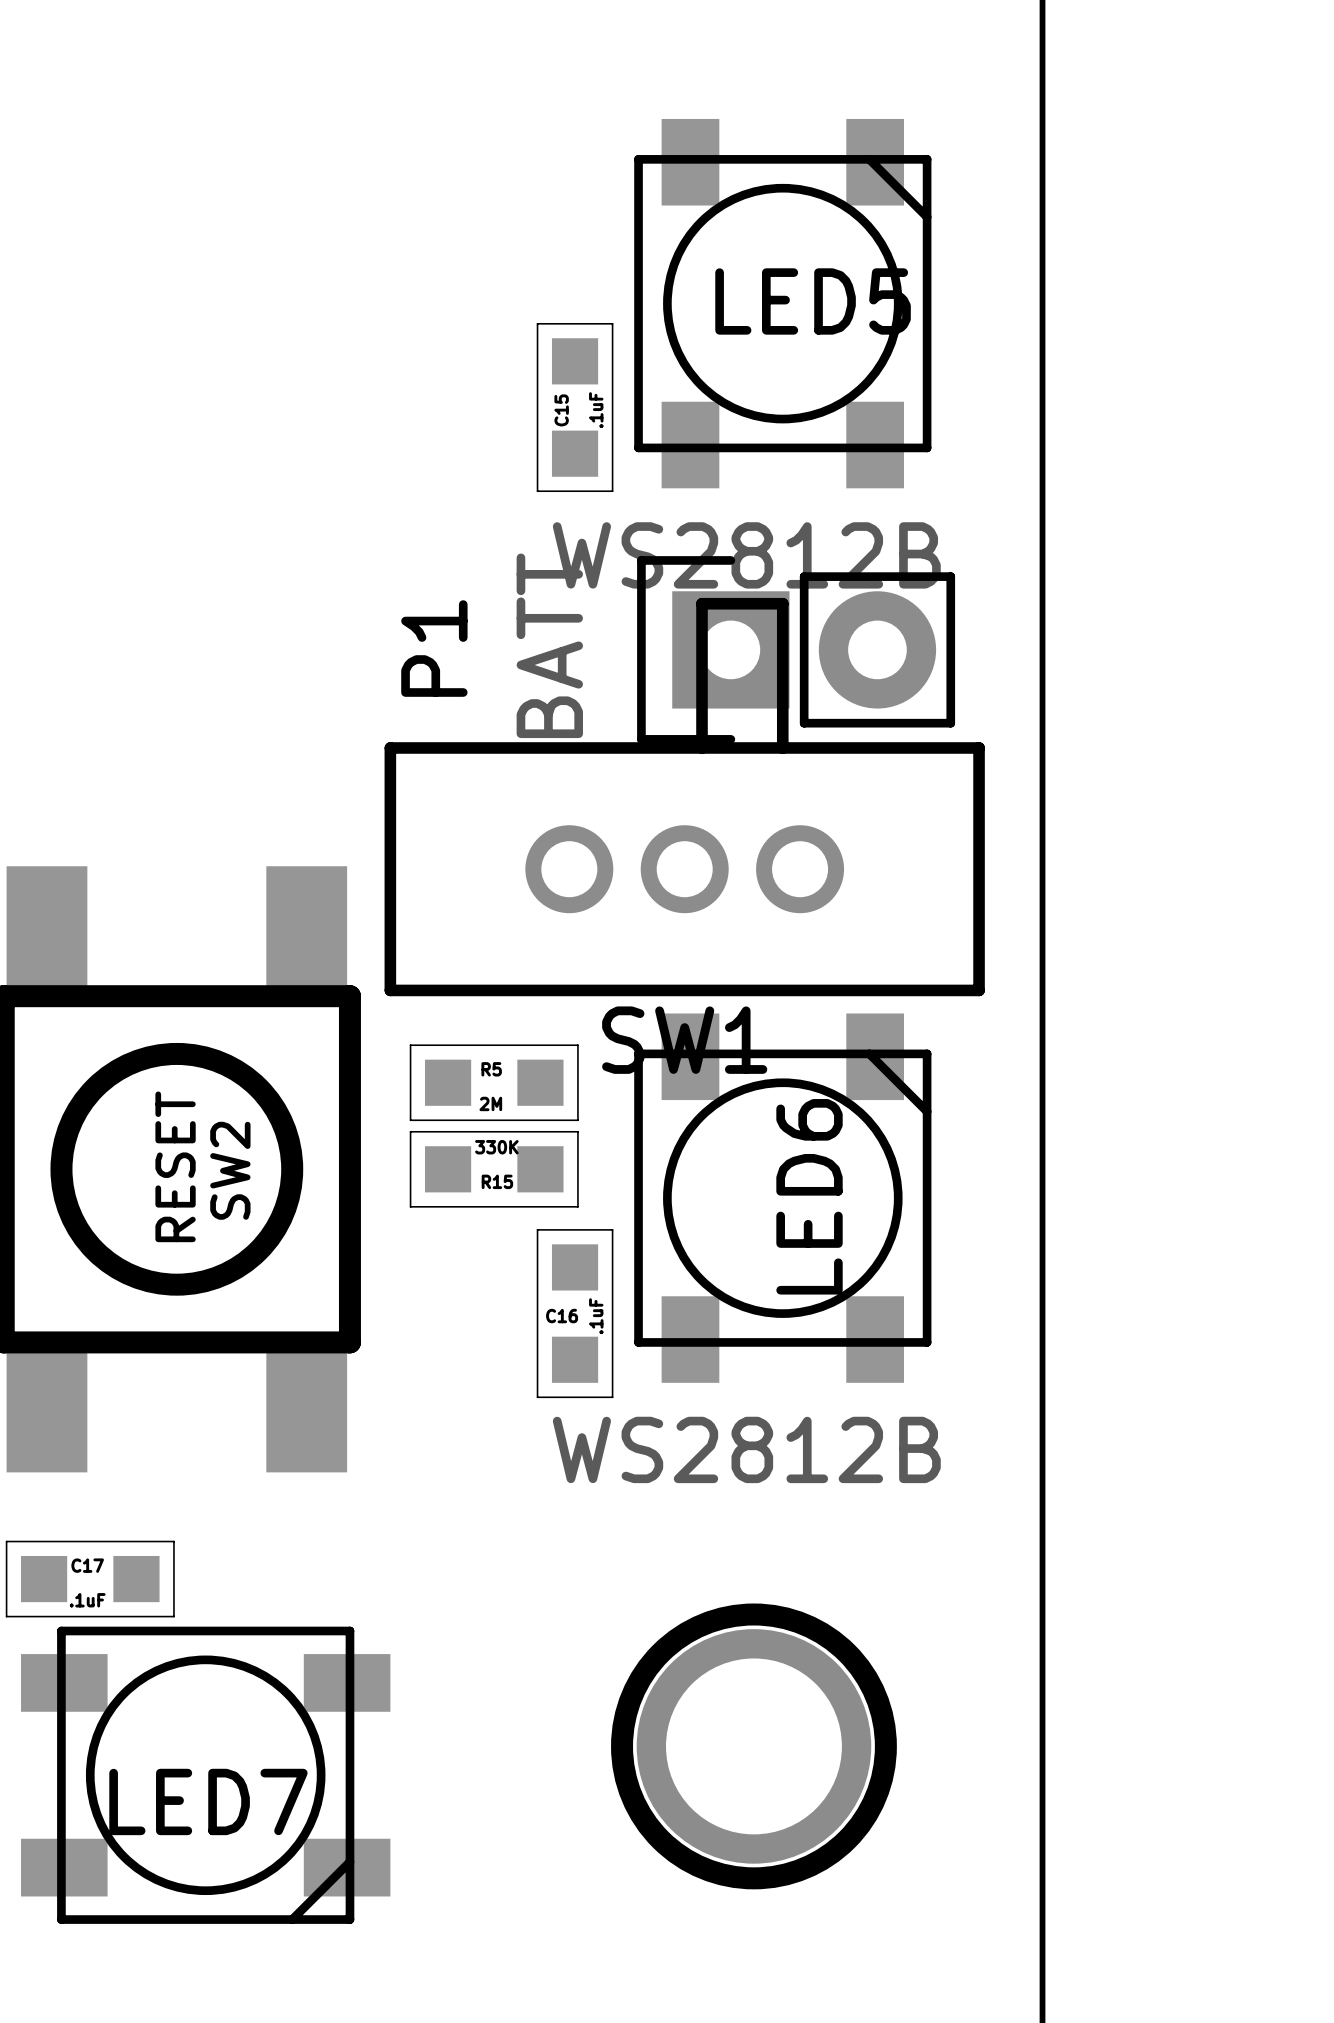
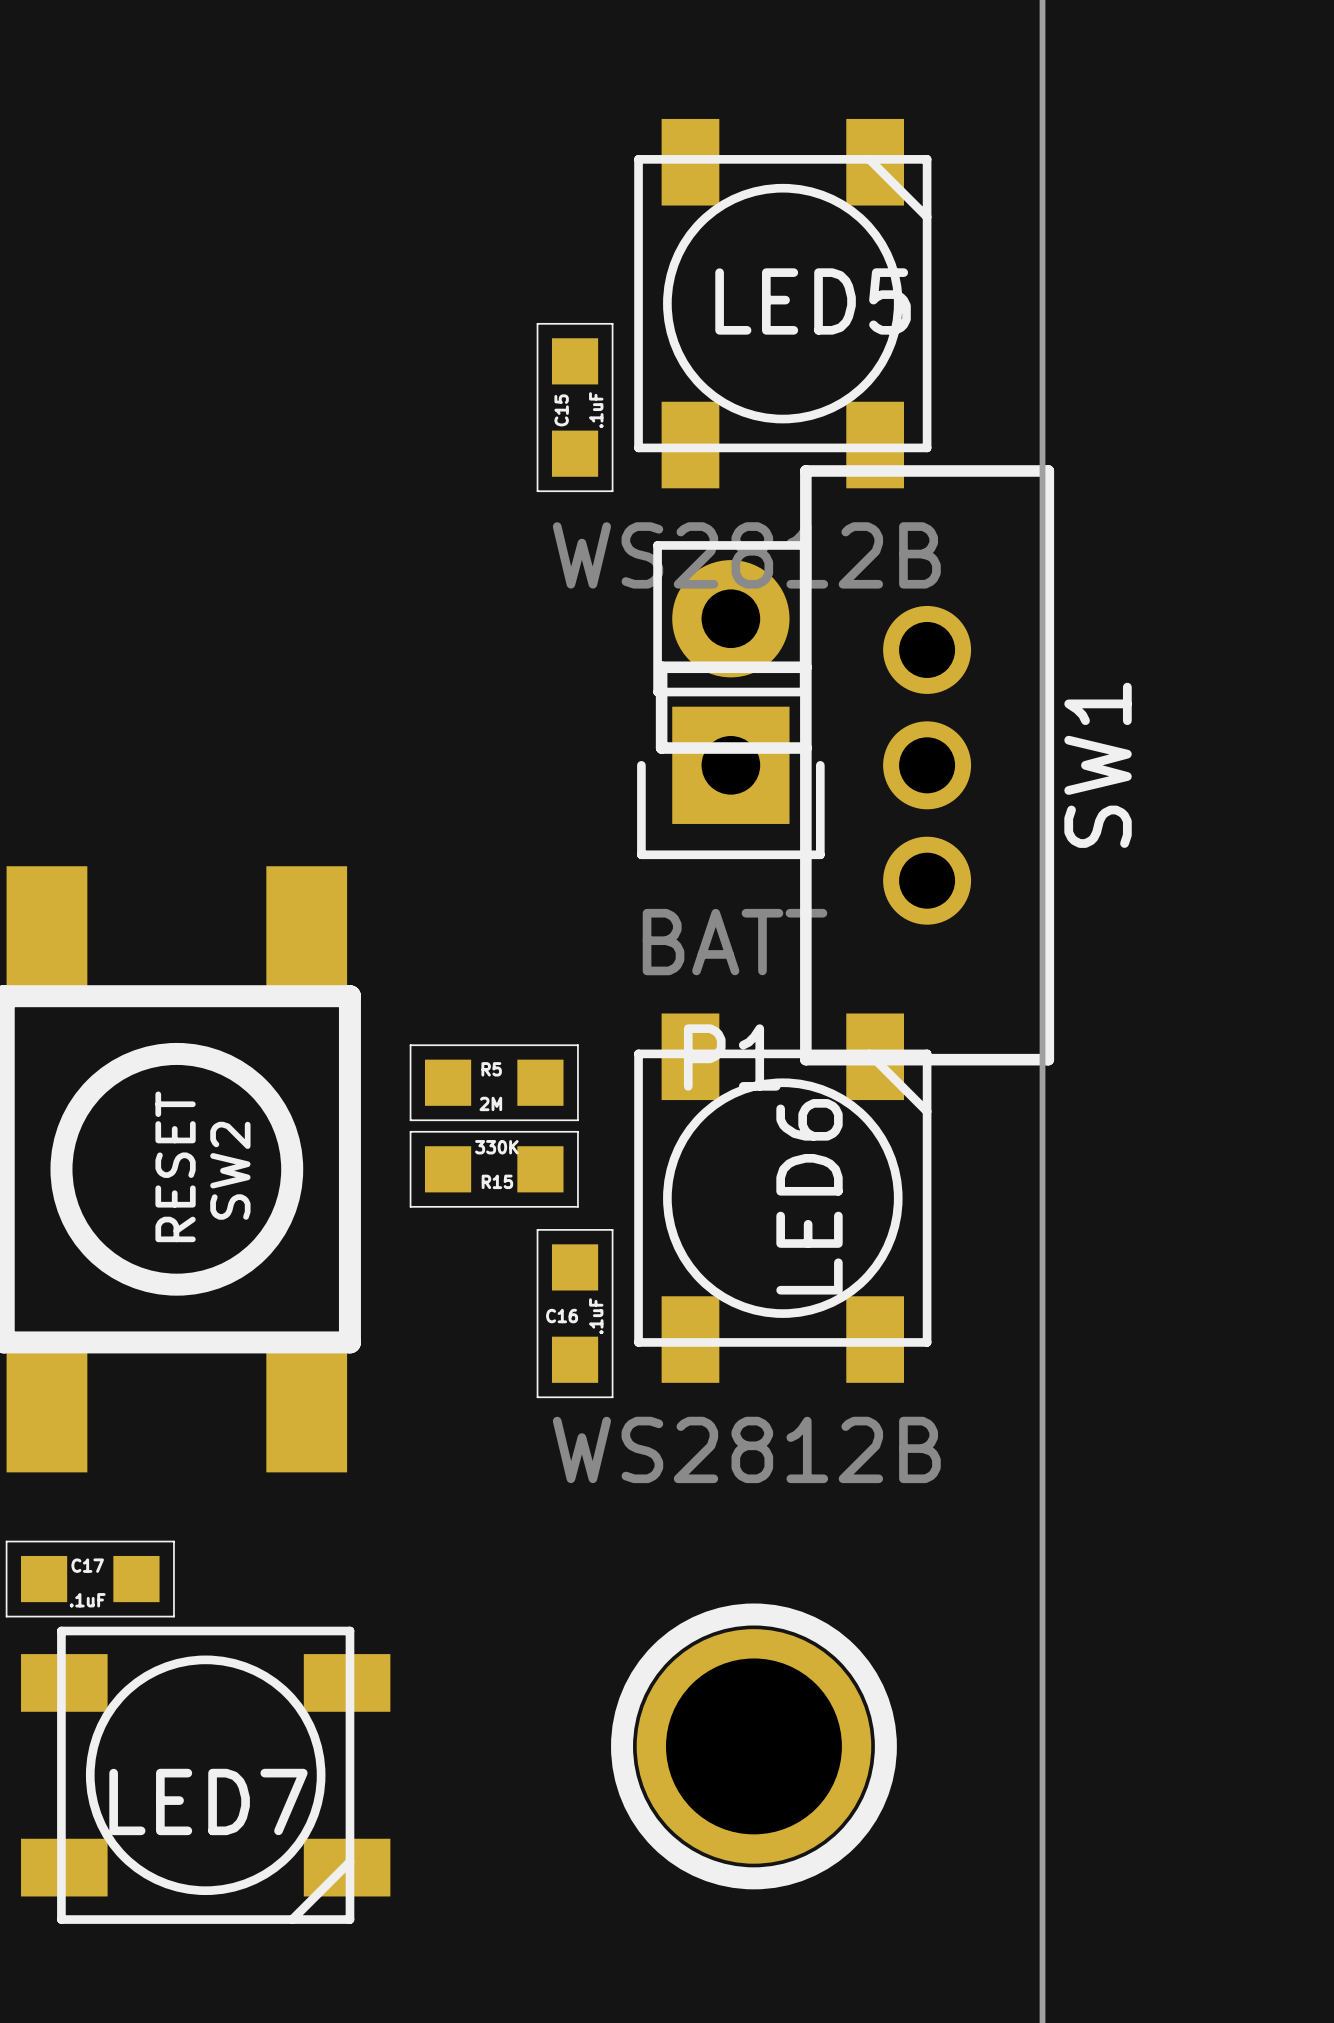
P1 rotation: 0° (796, 649) -> 90° counterclockwise (730, 700)
SW1 rotation: 0° (684, 797) -> 90° counterclockwise (854, 765)

